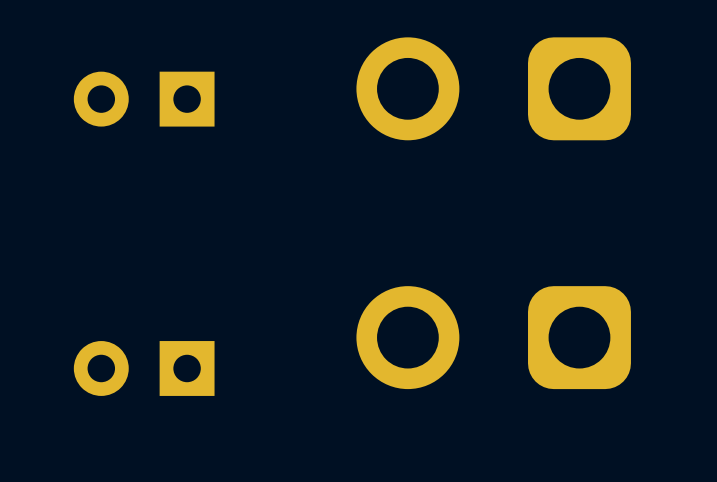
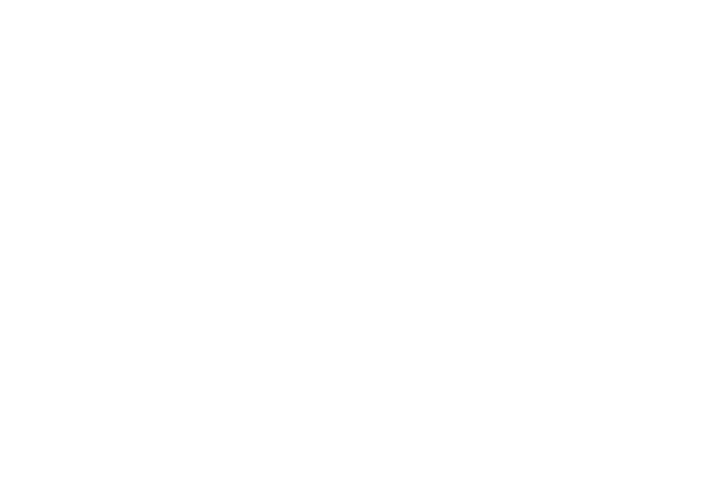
part: (493, 88) -> none
part: (144, 99) -> none
part: (493, 337) -> none
part: (144, 368) -> none

